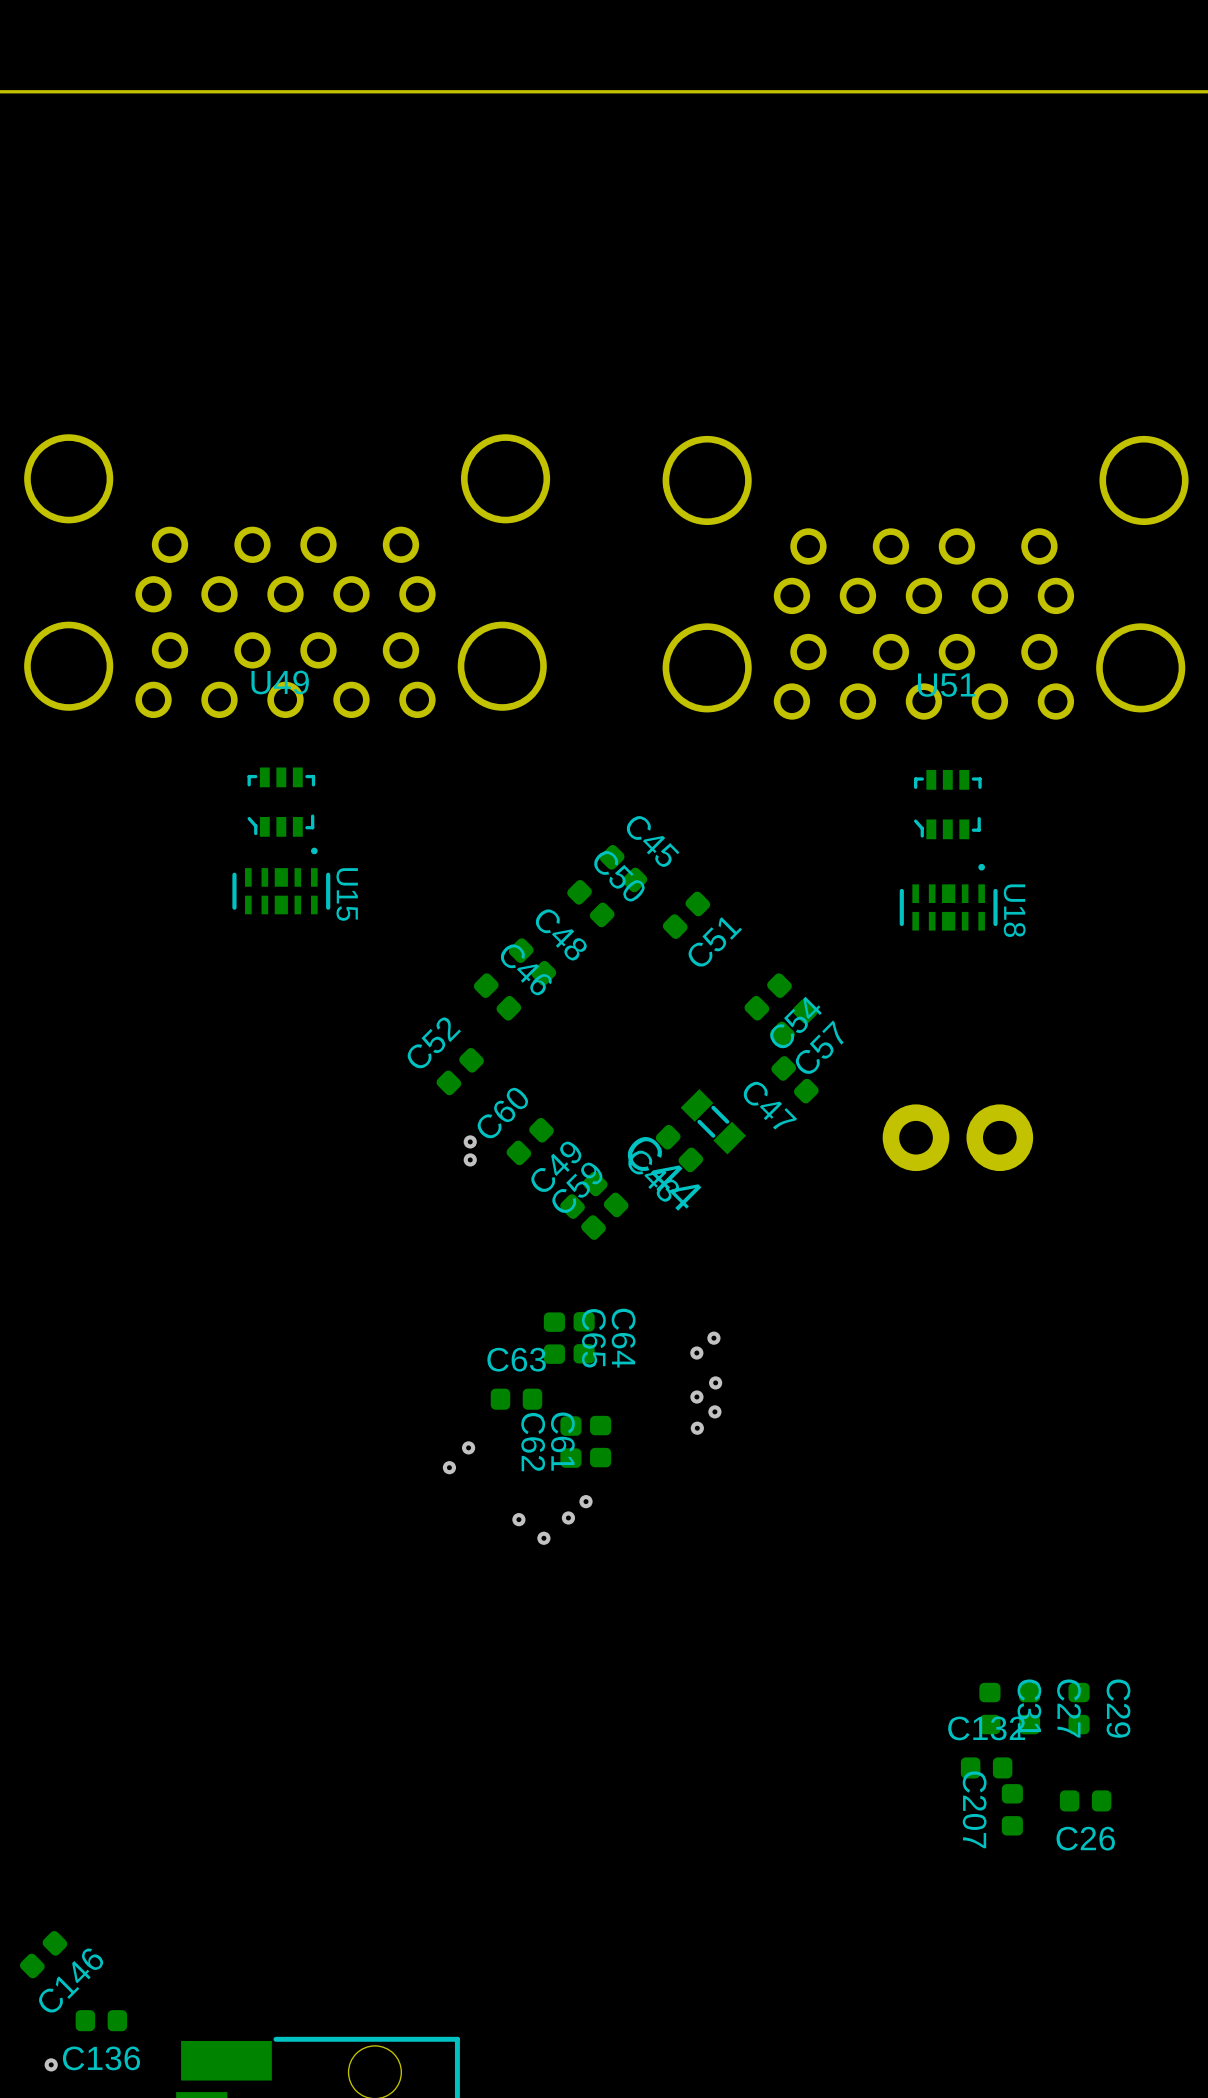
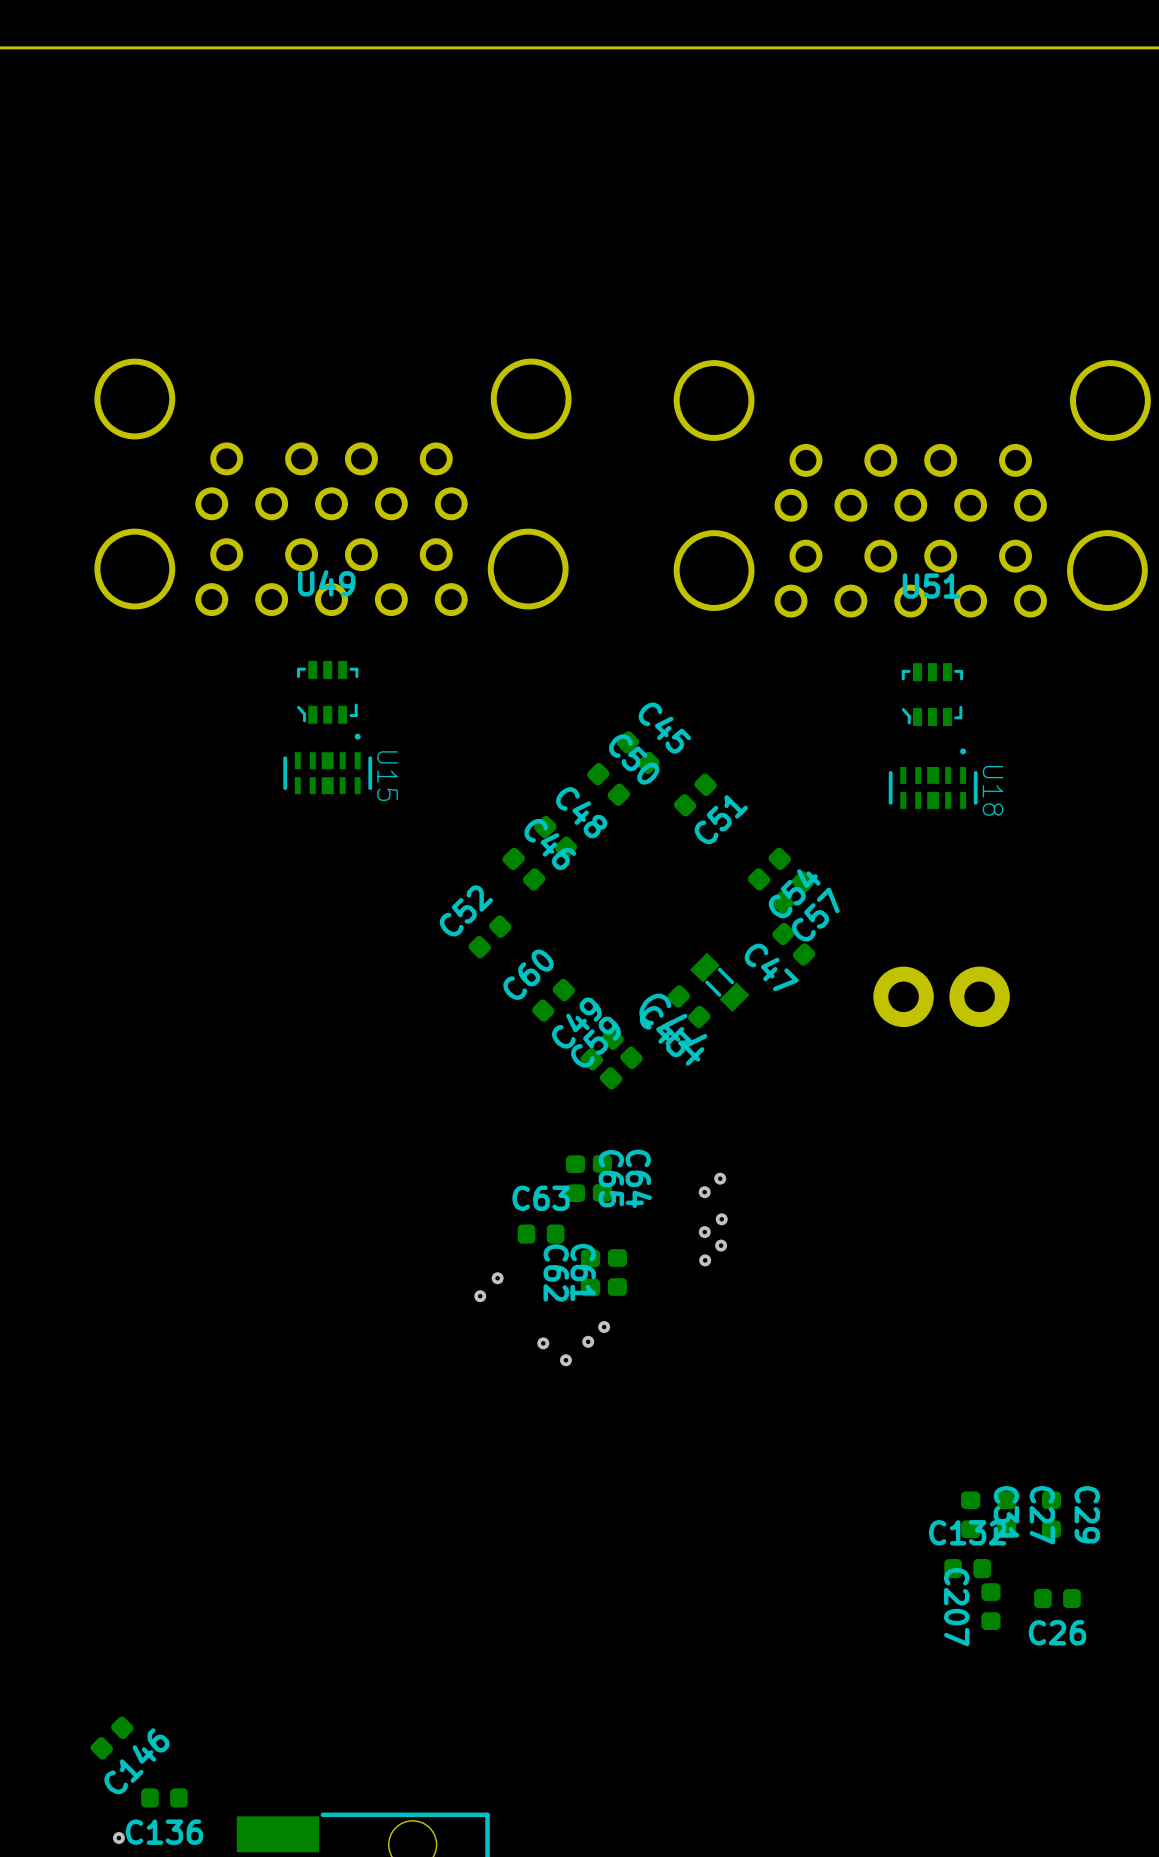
via: (470, 1141) -> none
via: (470, 1159) -> none

